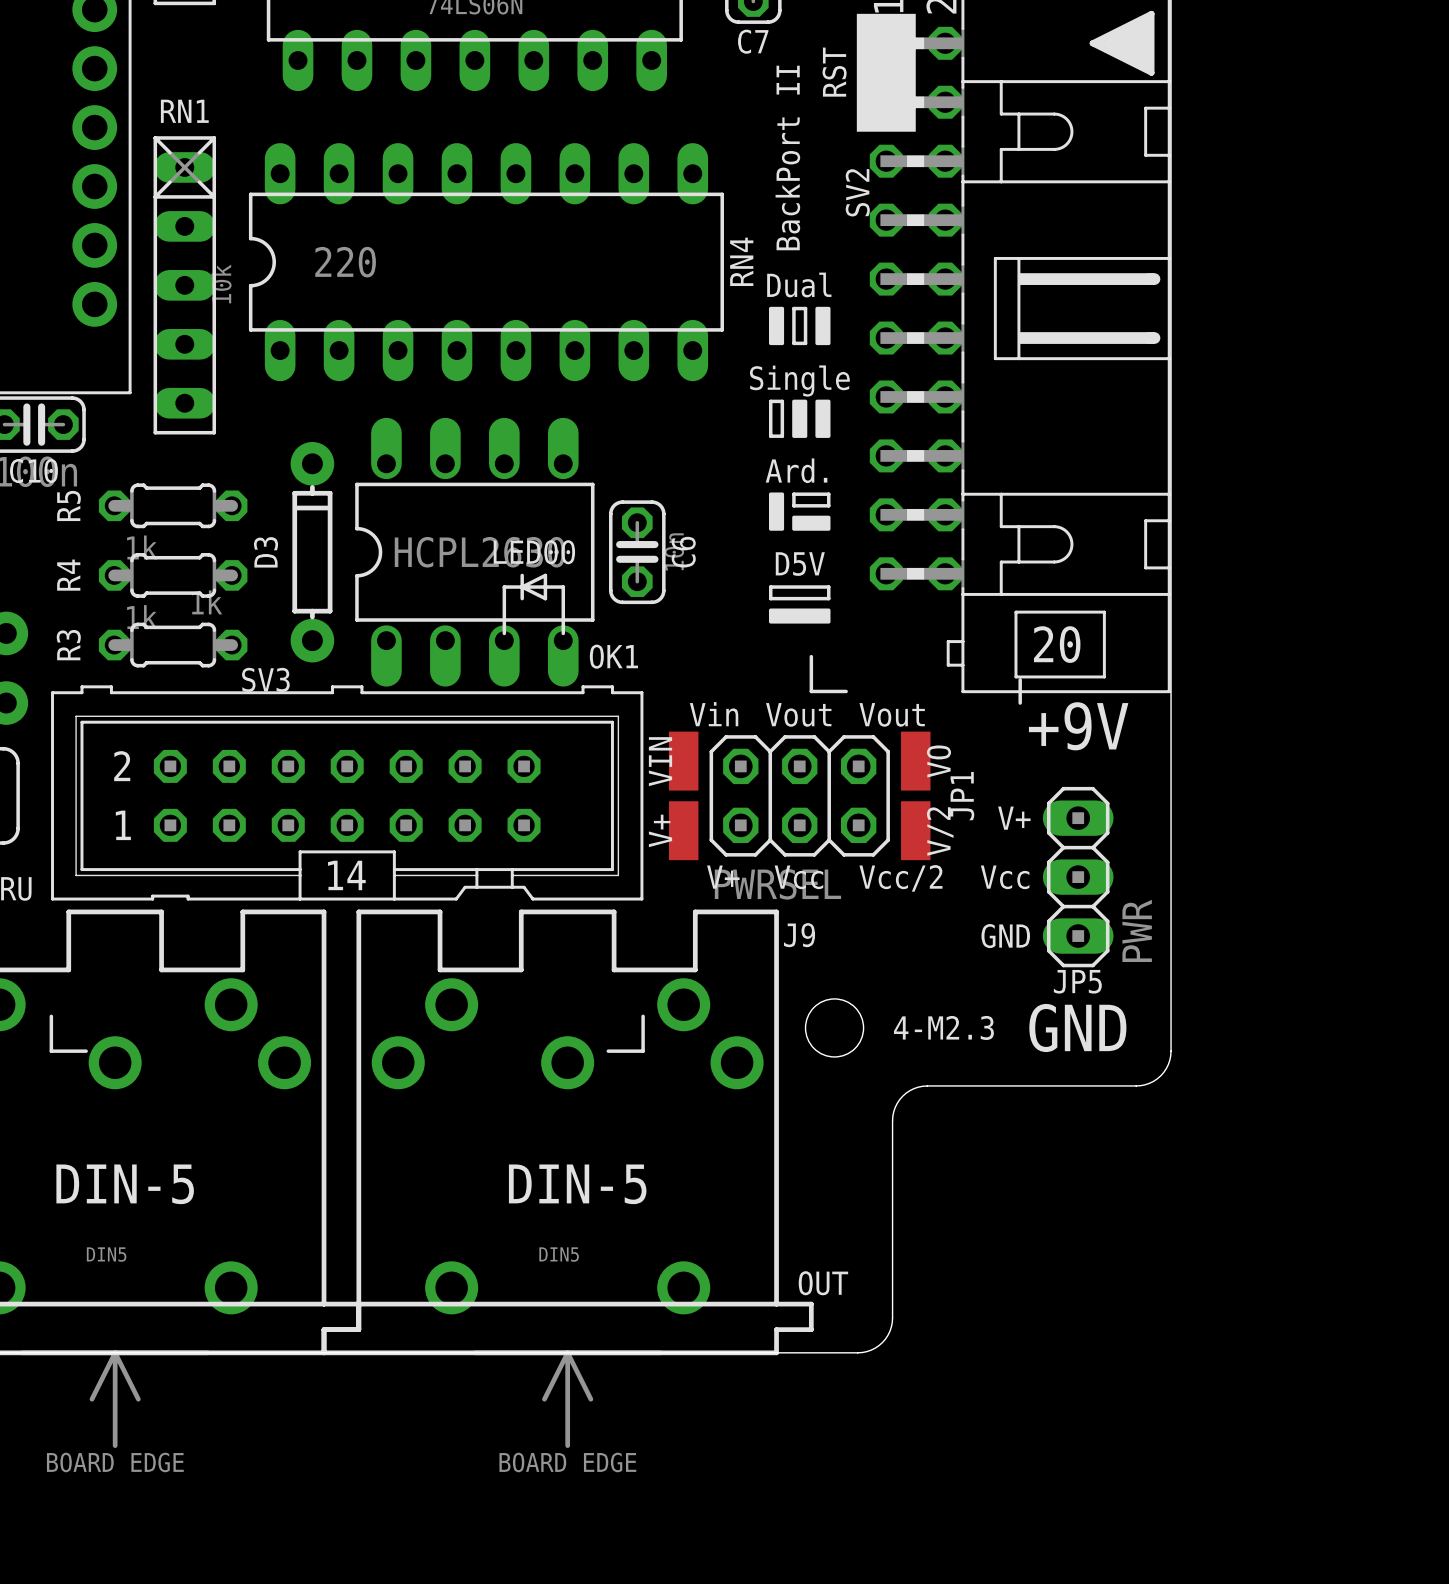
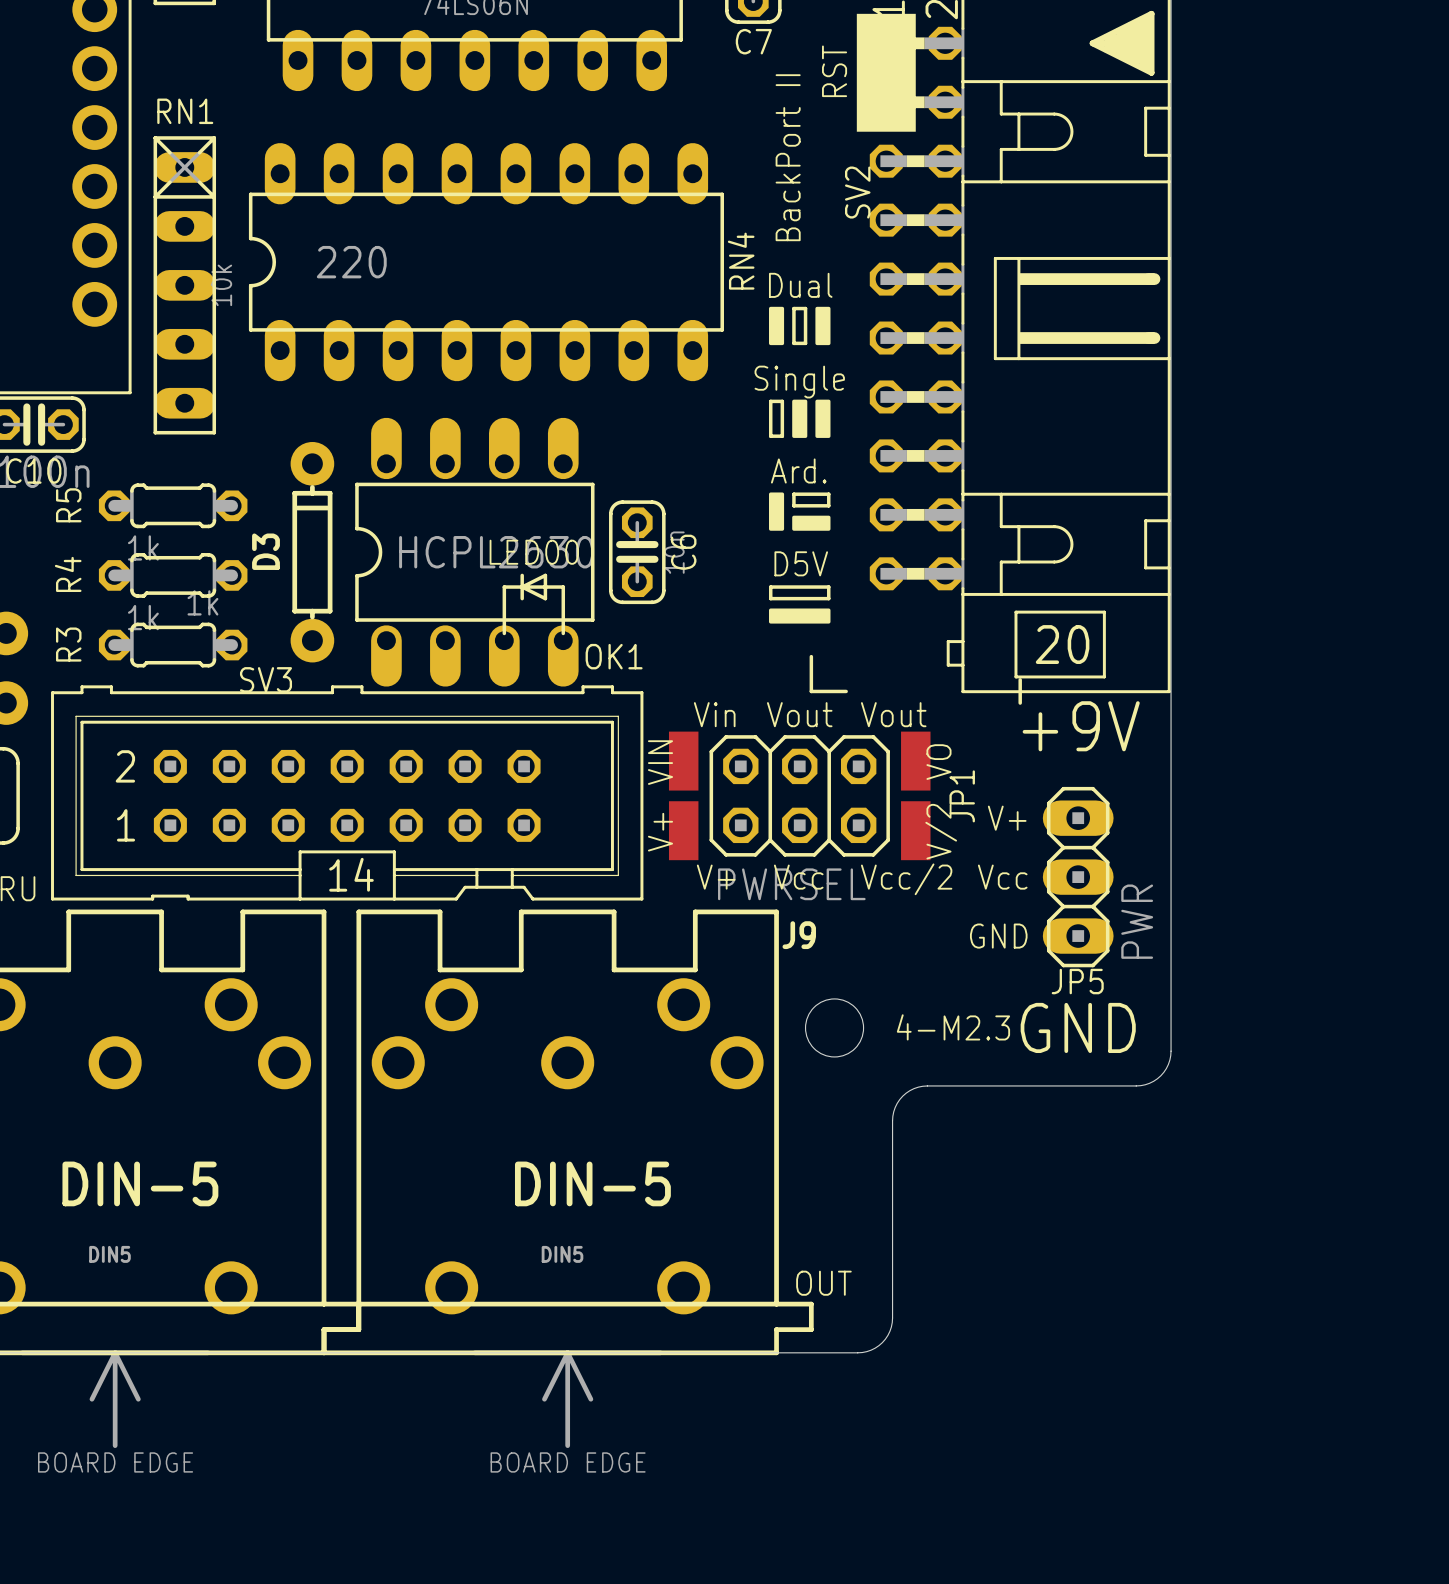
line: (51, 1016) (51, 1051) (86, 1051) -> none
line: (643, 1016) (643, 1051) (608, 1051) -> none

